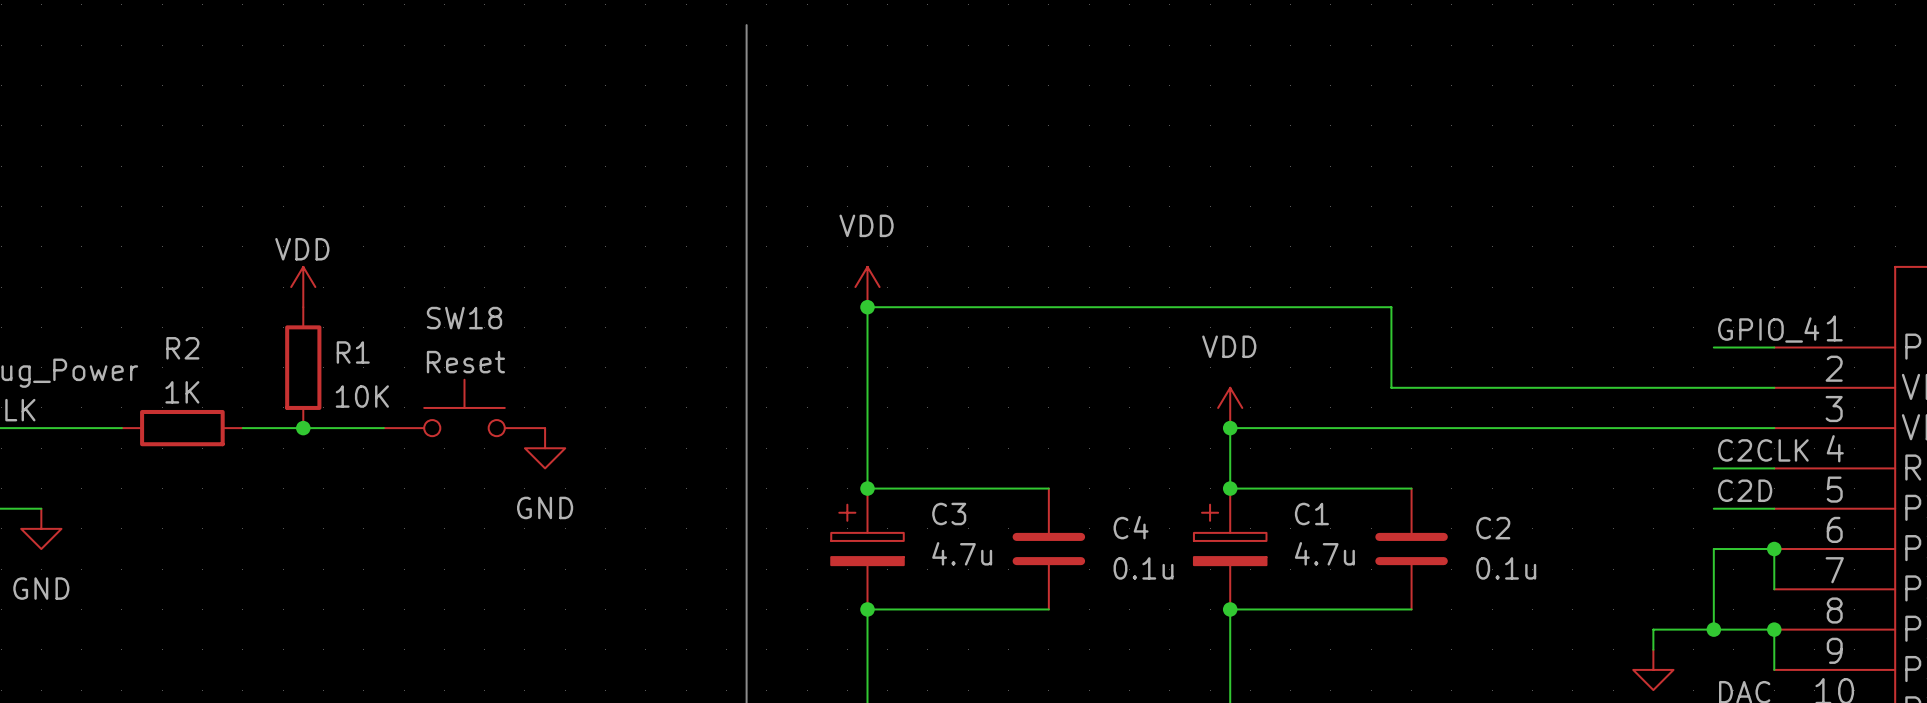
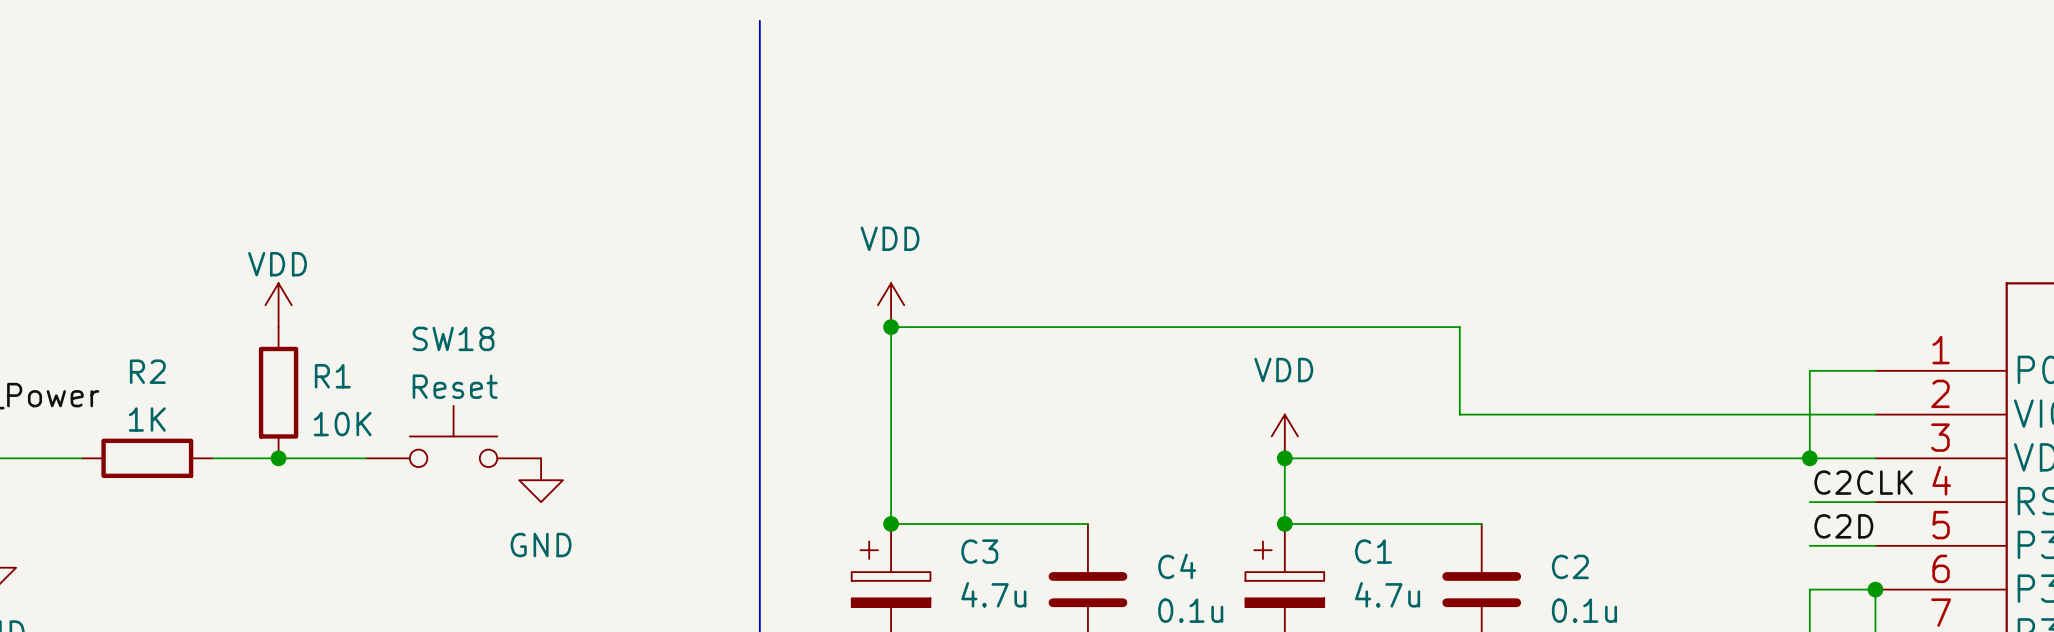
label: GPIO_4 (1768, 330) -> none
wire: none -> (1809, 370) (1809, 458)
junction: none -> (1809, 458)

